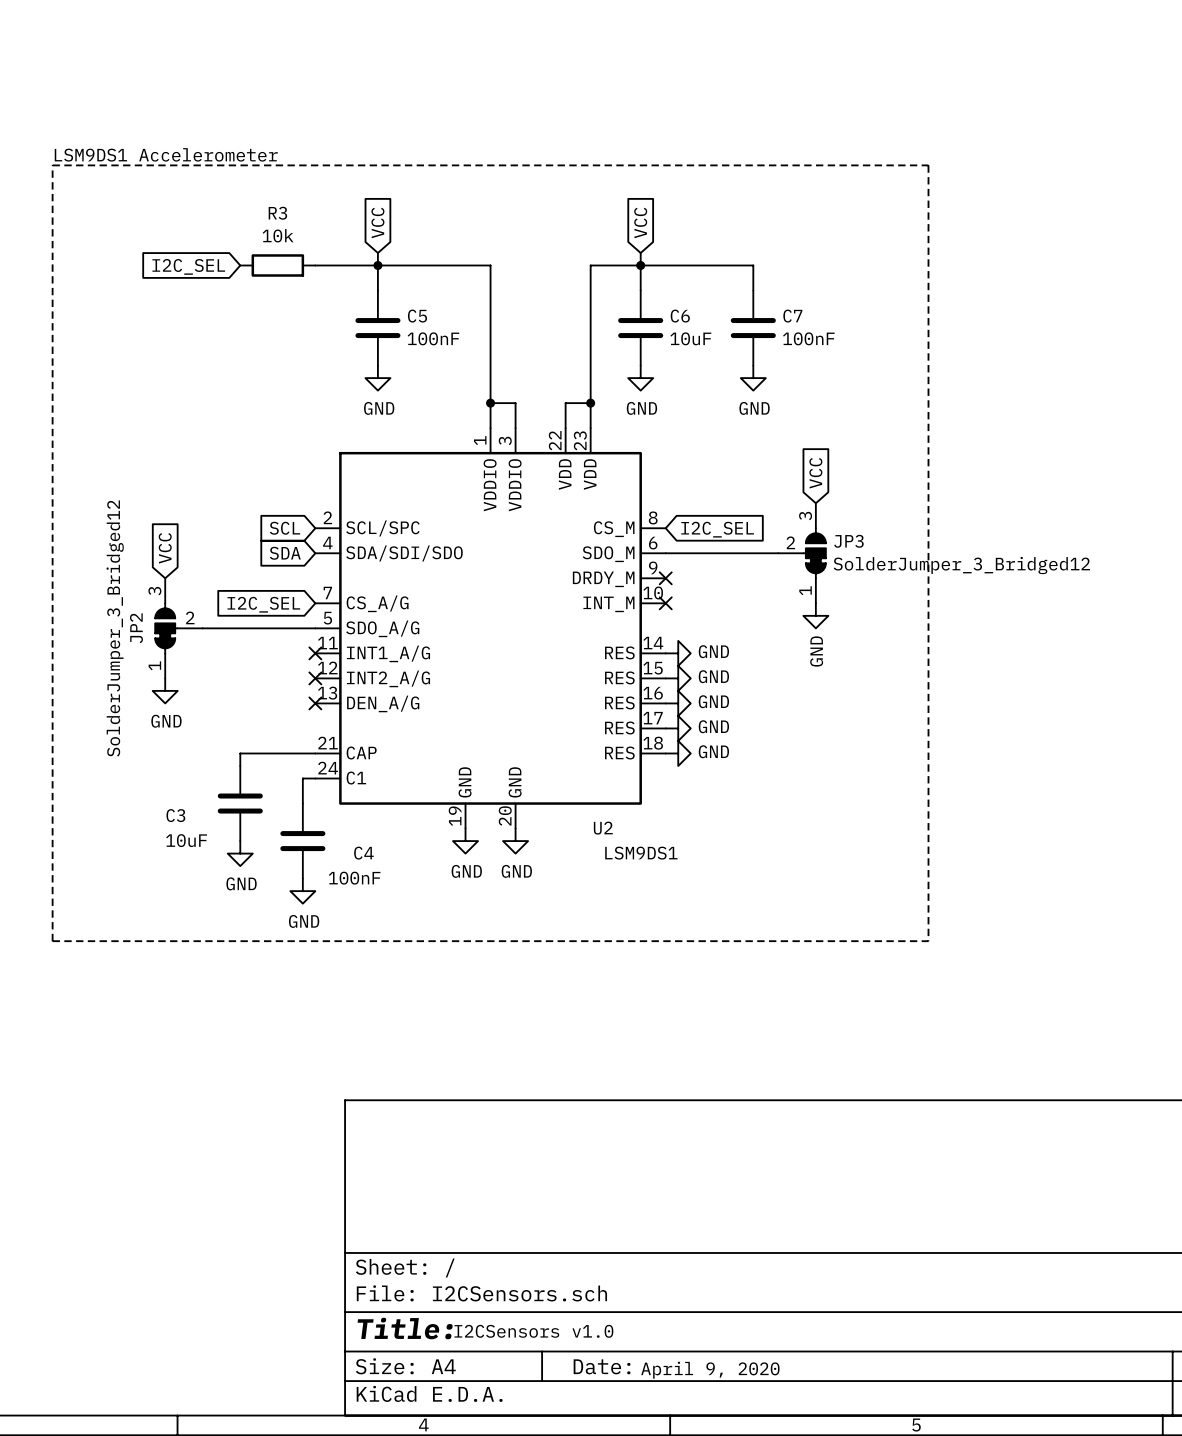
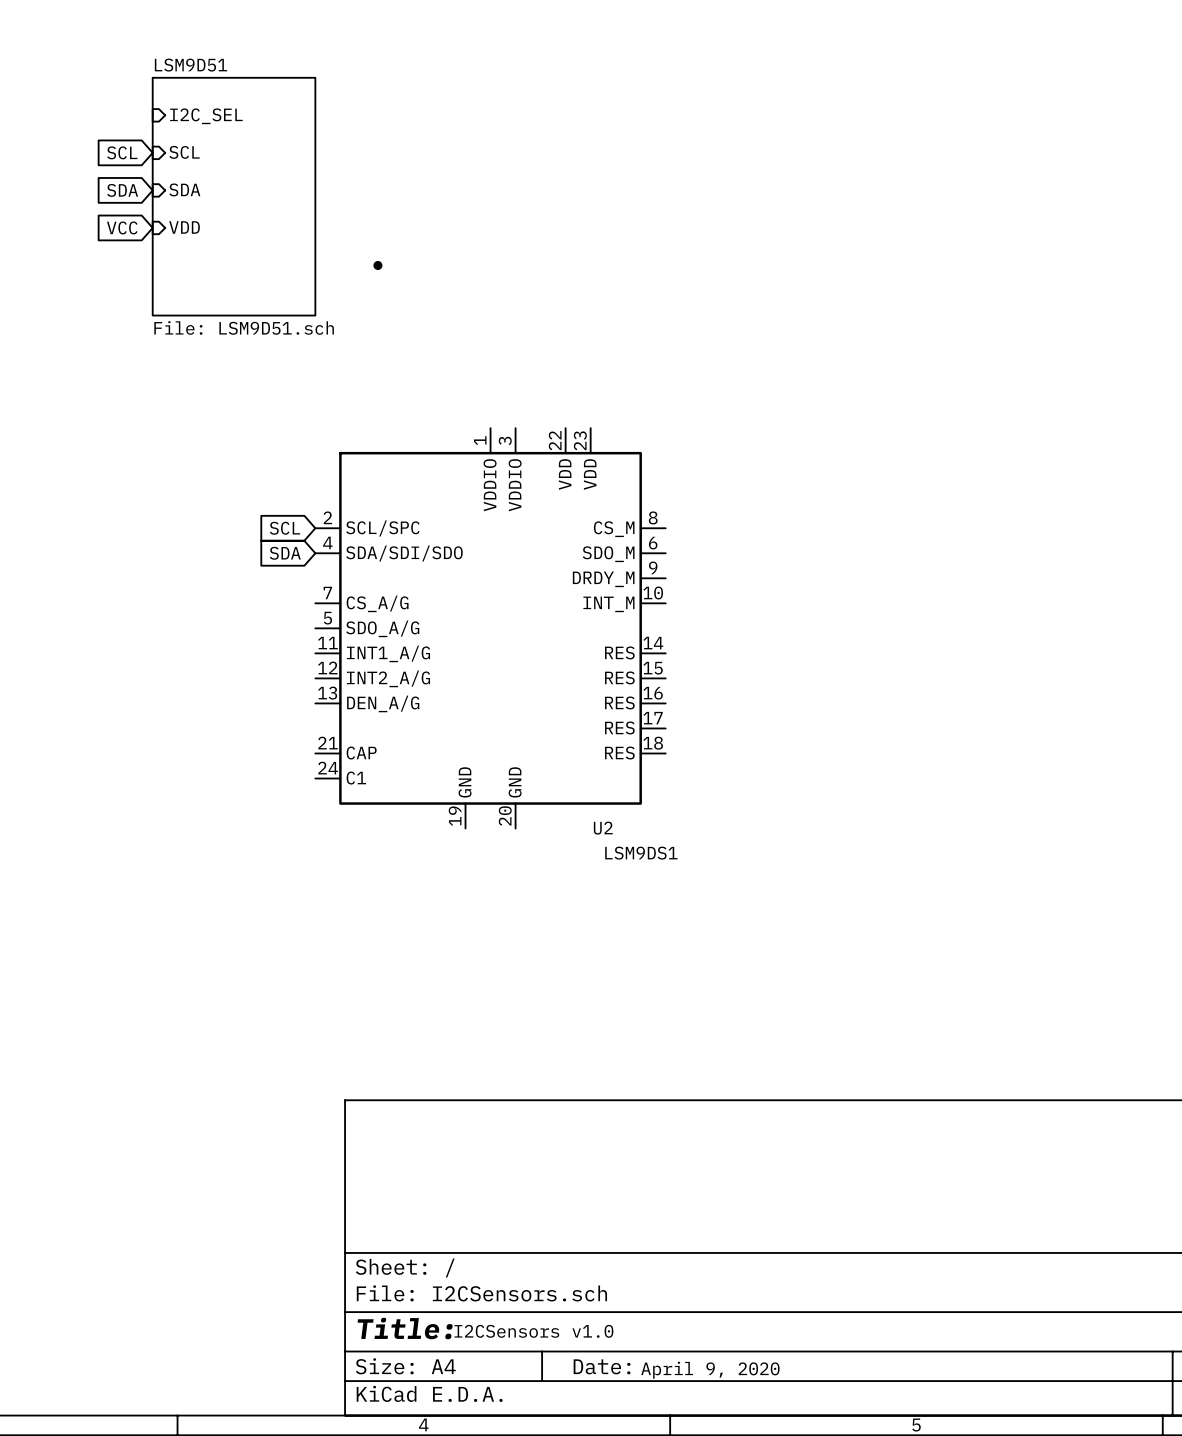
sheet pin: none -> I2C_SEL (206, 116)
global label: none -> SCL (122, 152)
sheet pin: none -> SCL (184, 152)
text: LSM9DS1 Accelerometer (166, 154) -> none
line: (52, 165) (52, 941) (928, 941) (928, 165) (52, 165) -> none
sheet pin: none -> SDA (184, 189)
global label: none -> SDA (122, 190)
sheet LSM9D51: none -> File: LSM9D51.sch (234, 196)
global label: VCC (377, 223) -> none
global label: VCC (640, 223) -> none
global label: none -> VCC (122, 227)
sheet pin: none -> VDD (184, 227)
wire: (377, 252) (377, 290) -> none
wire: (640, 252) (640, 290) -> none
R3: 10k (277, 265) -> none
wire: (315, 265) (490, 265) (490, 428) -> none
junction: (640, 265) -> none
global label: I2C_SEL (188, 266) -> none
wire: (753, 290) (753, 265) (590, 265) (590, 428) -> none
C5: 100nF (377, 328) -> none
C6: 10uF (640, 328) -> none
C7: 100nF (753, 328) -> none
power symbol: GND (377, 378) -> none
power symbol: GND (640, 378) -> none
power symbol: GND (753, 378) -> none
wire: (490, 403) (515, 403) (515, 428) -> none
junction: (490, 403) -> none
wire: (590, 403) (565, 403) (565, 428) -> none
junction: (590, 403) -> none
global label: VCC (815, 473) -> none
global label: I2C_SEL (717, 529) -> none
global label: VCC (165, 548) -> none
wire: (665, 553) (778, 553) -> none
JP3: SolderJumper_3_Bridged12 (802, 553) -> none
no-connect mark: (665, 578) -> none
no-connect mark: (665, 603) -> none
global label: I2C_SEL (263, 604) -> none
power symbol: GND (815, 615) -> none
JP2: SolderJumper_3_Bridged12 (178, 628) -> none
wire: (202, 628) (315, 628) -> none
no-connect mark: (315, 653) -> none
power symbol: GND (678, 653) -> none
no-connect mark: (315, 678) -> none
power symbol: GND (678, 678) -> none
power symbol: GND (165, 690) -> none
no-connect mark: (315, 703) -> none
power symbol: GND (678, 703) -> none
power symbol: GND (678, 728) -> none
wire: (315, 753) (240, 753) (240, 766) -> none
power symbol: GND (678, 753) -> none
wire: (315, 778) (302, 778) (302, 803) -> none
C3: 10uF (240, 803) -> none
C4: 100nF (302, 841) -> none
power symbol: GND (465, 841) -> none
power symbol: GND (515, 841) -> none
power symbol: GND (240, 853) -> none
power symbol: GND (302, 891) -> none

